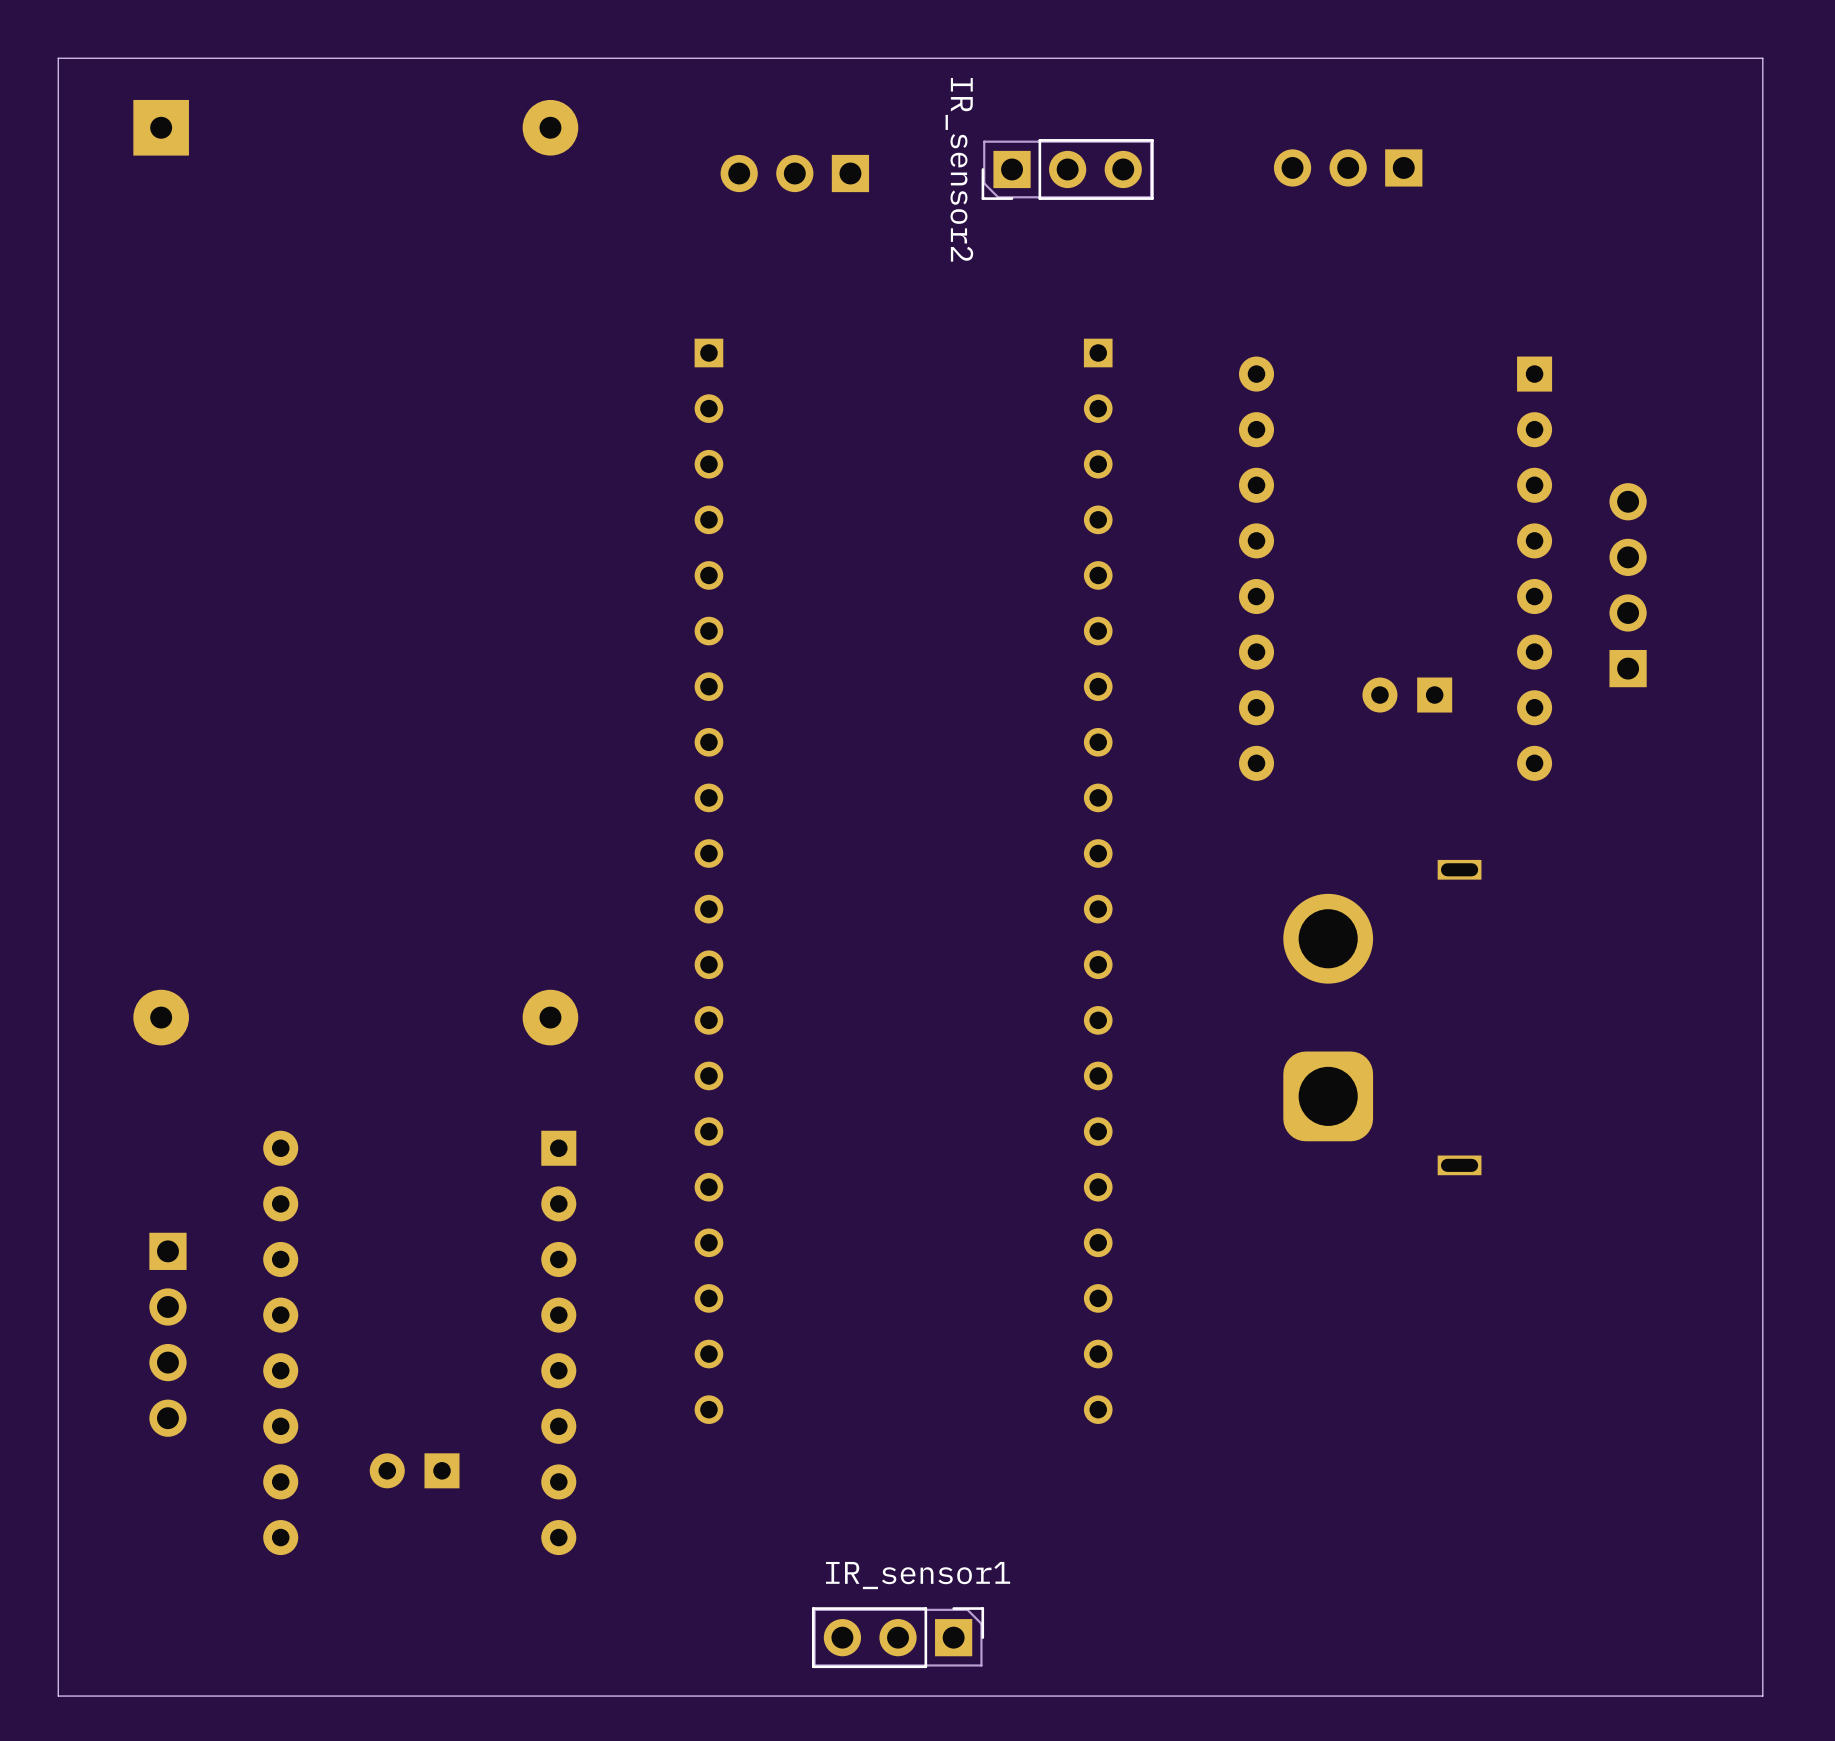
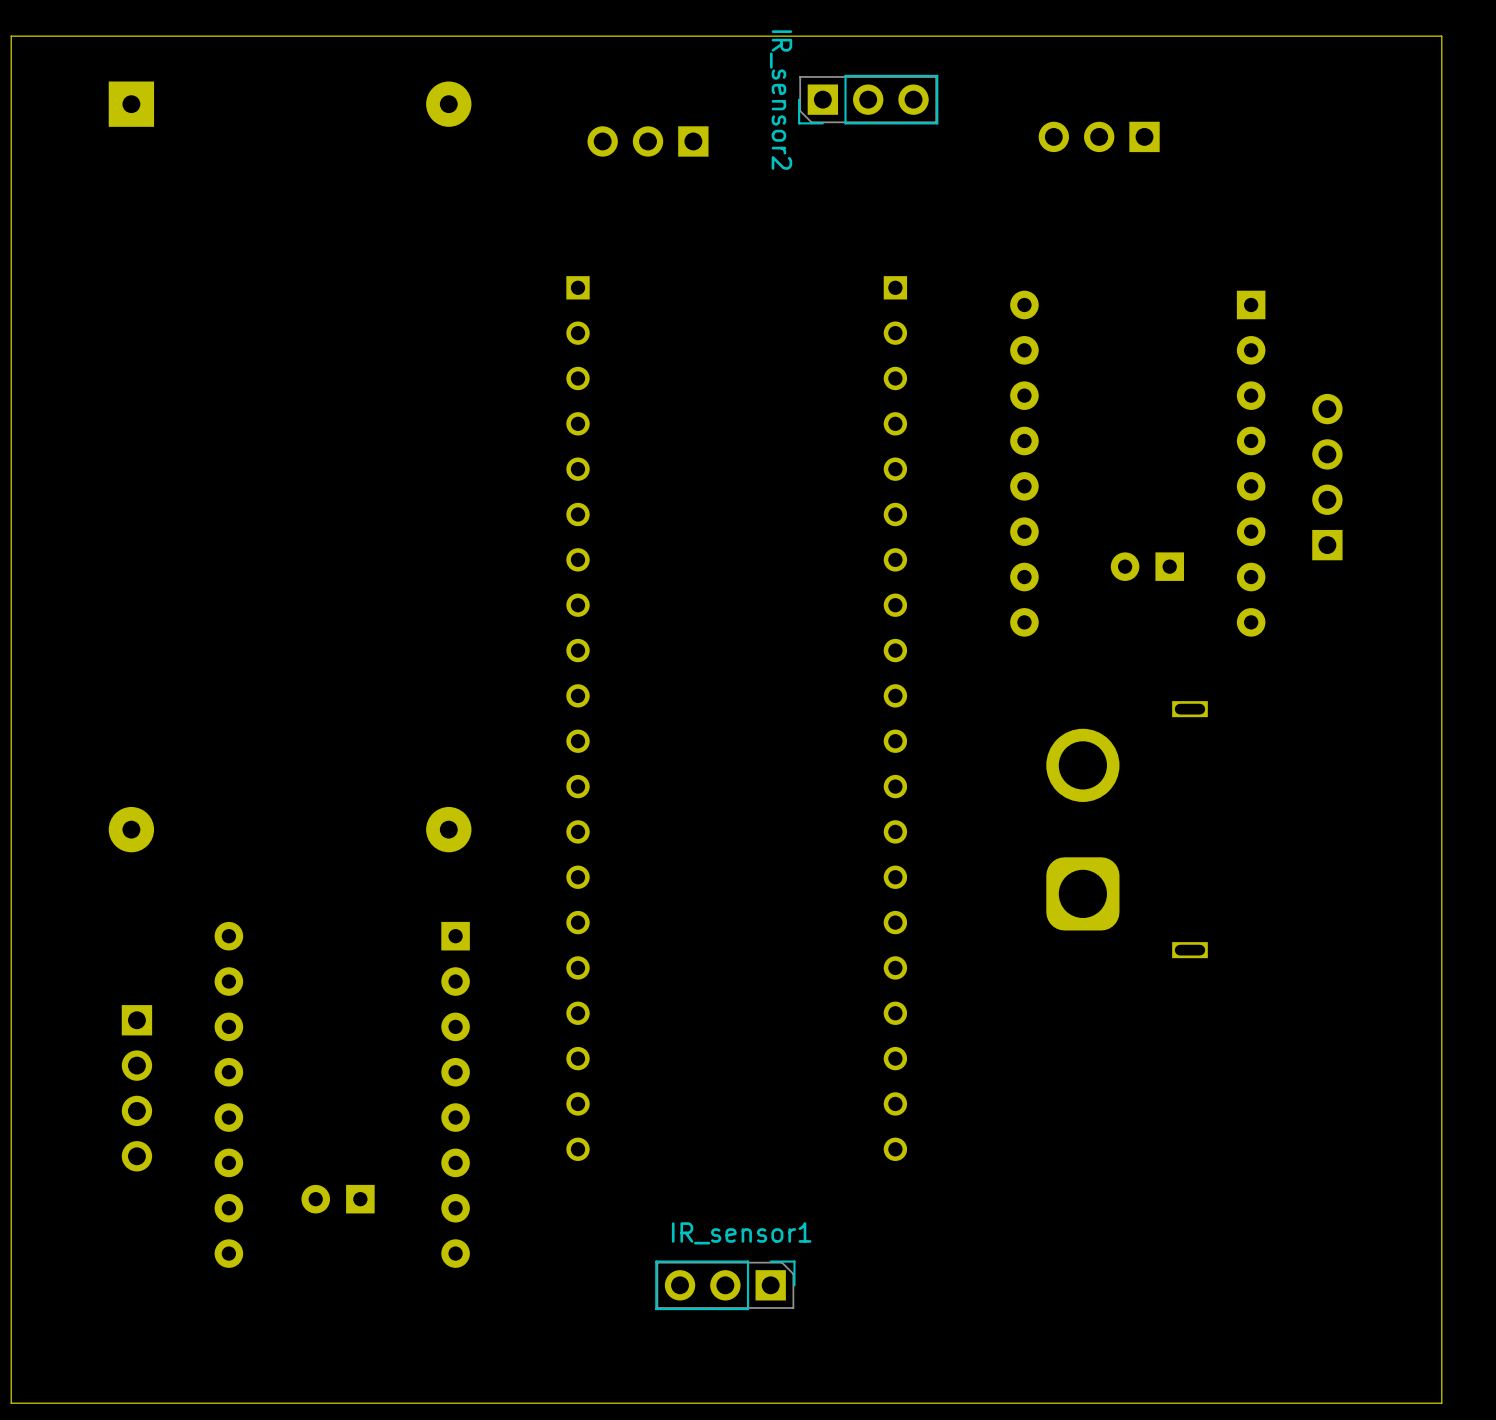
board edge: (1762, 58) (58, 58) (58, 1696) (1762, 1696) (1762, 58) -> (1441, 36) (1441, 1403) (11, 1403) (11, 36) (1441, 36)
IR_sensor2 position: (1067, 169) -> (868, 99)
IR_sensor1 position: (898, 1637) -> (725, 1285)

